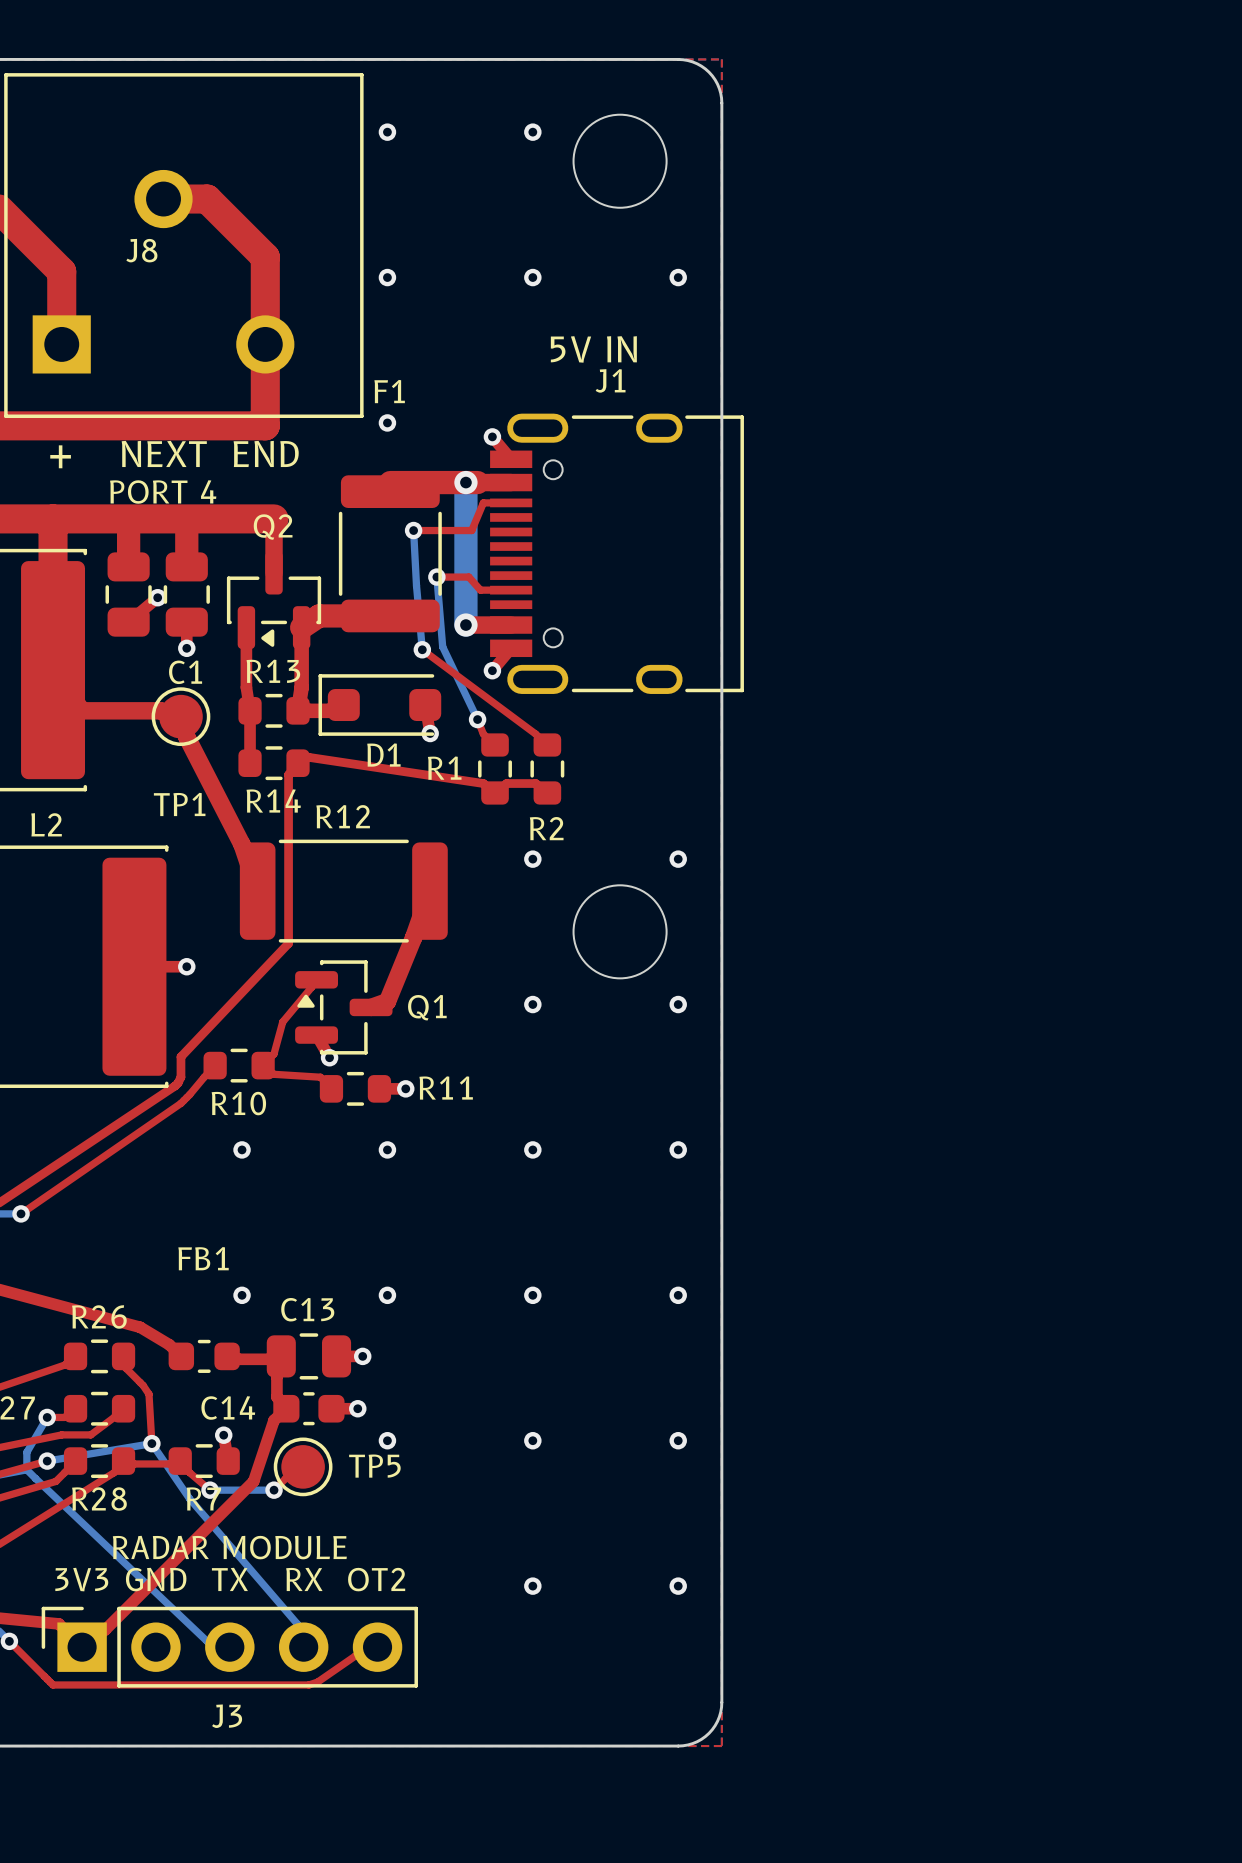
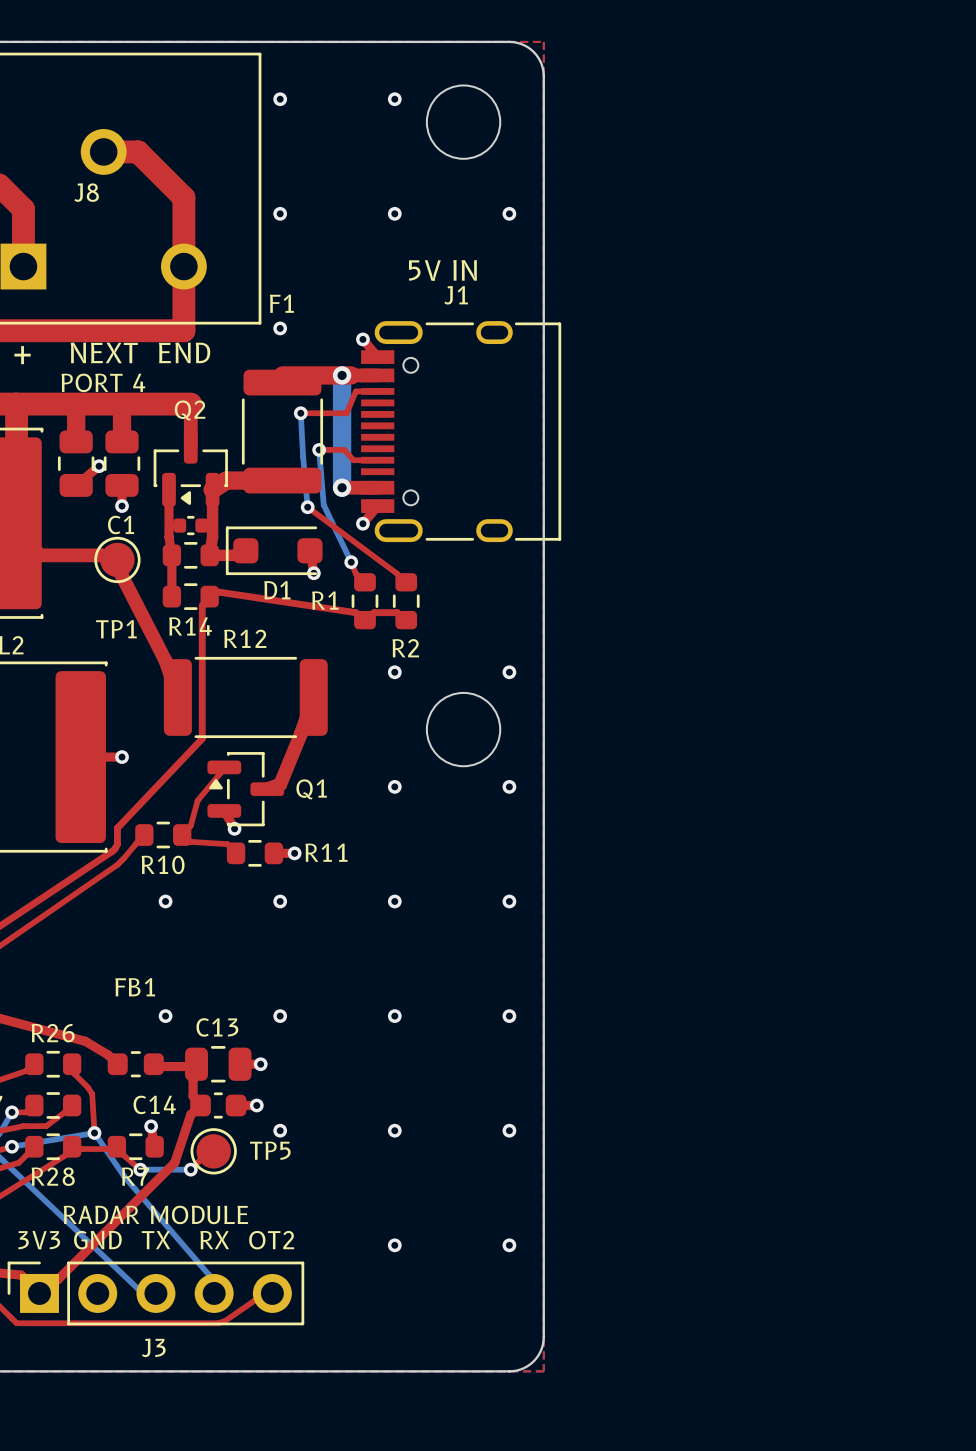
R13 name: R13 (273, 671) -> none
part: none -> (190, 525)

